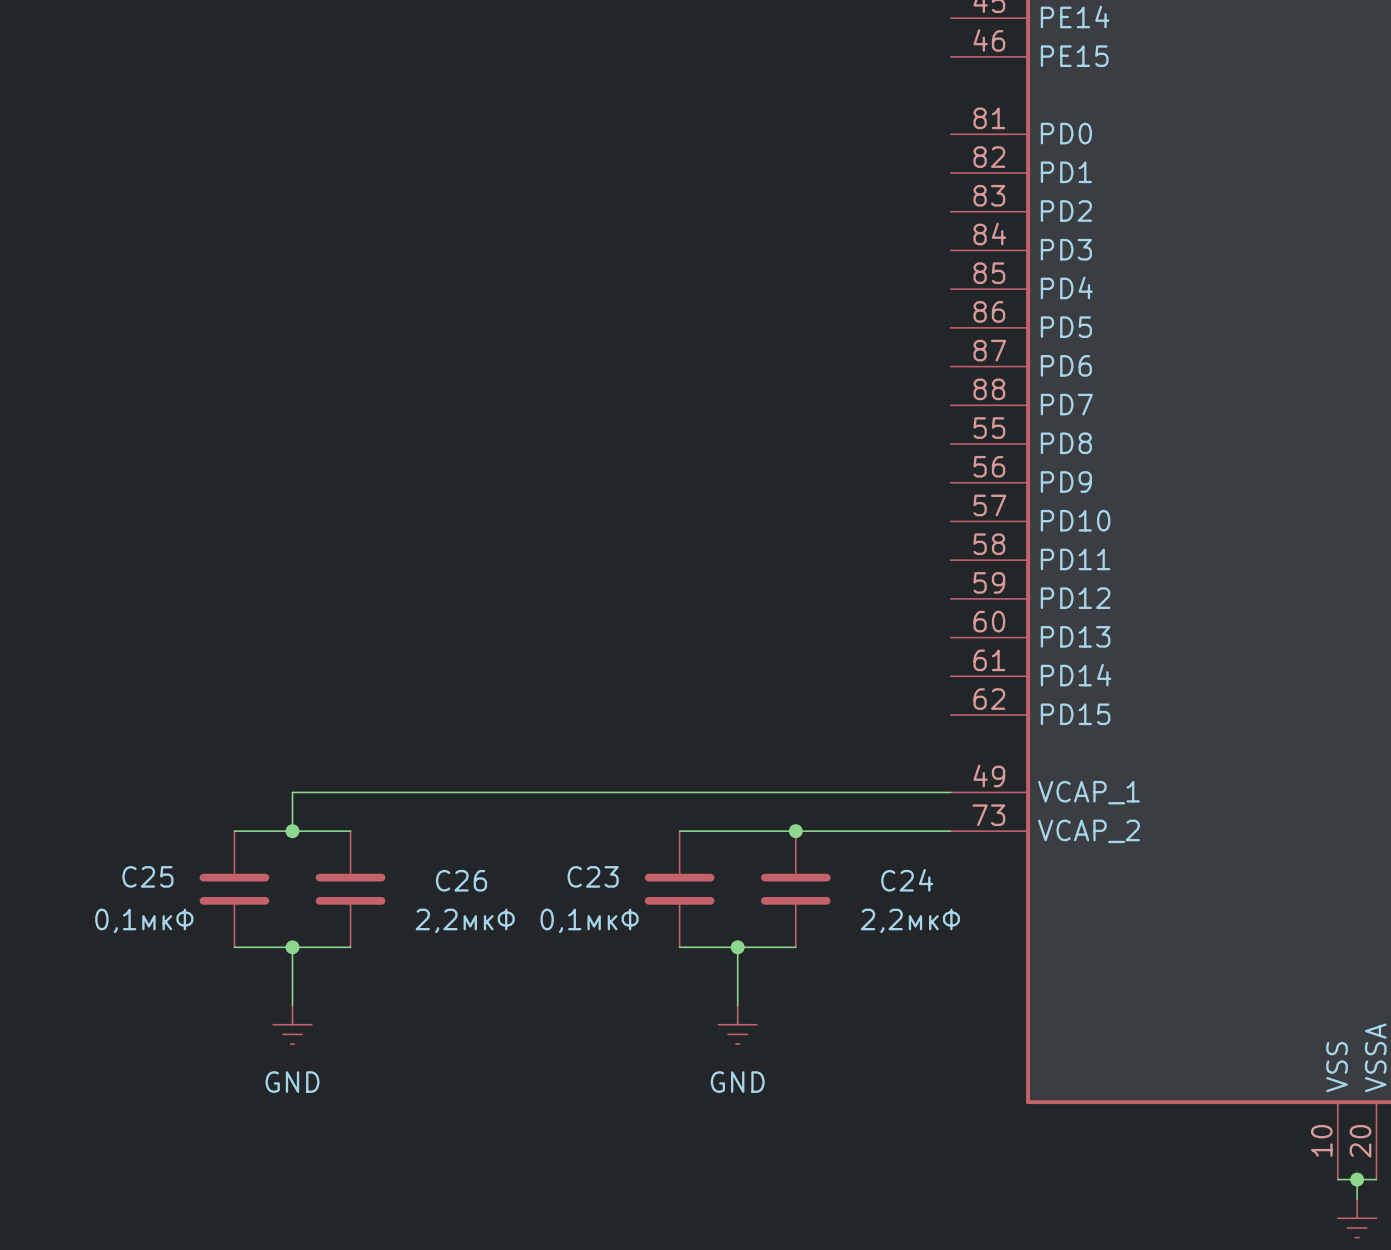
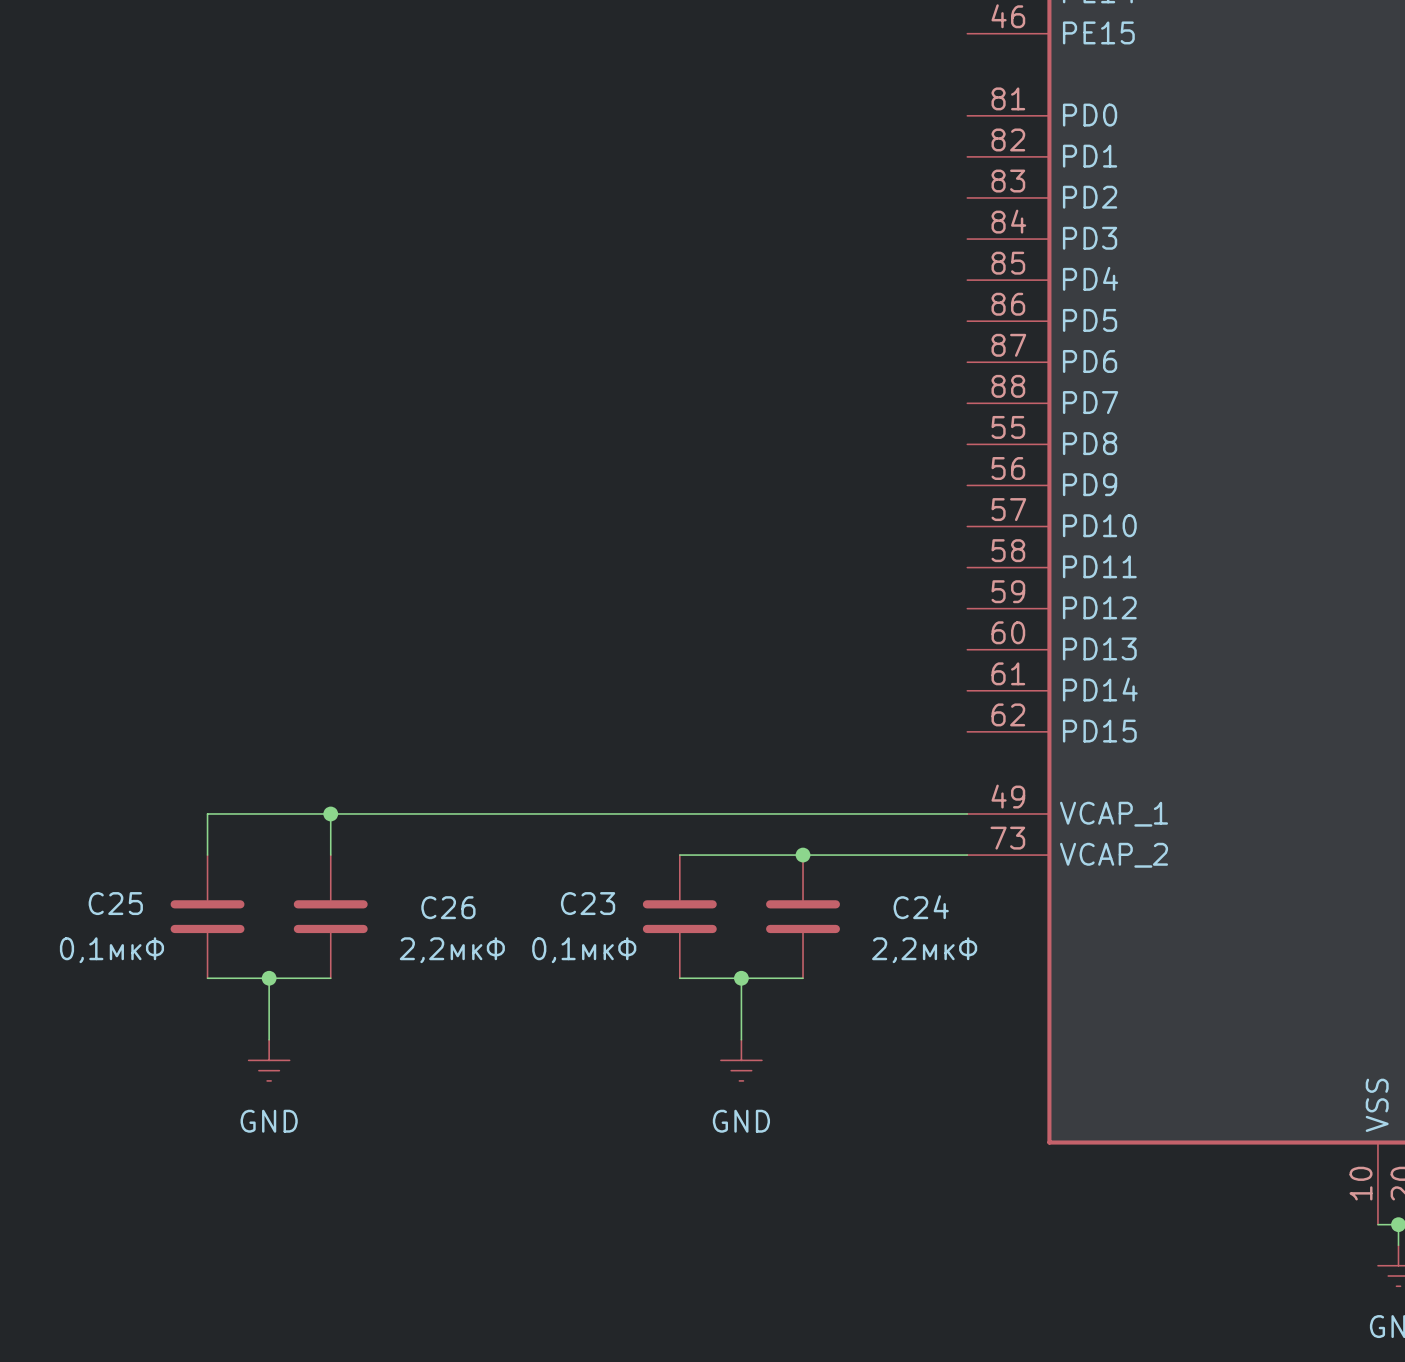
wire: (292, 792) (292, 831) -> (269, 813) (207, 813) (207, 855)
wire: (234, 831) (350, 831) -> (330, 813) (330, 855)
junction position: (292, 831) -> (330, 813)

